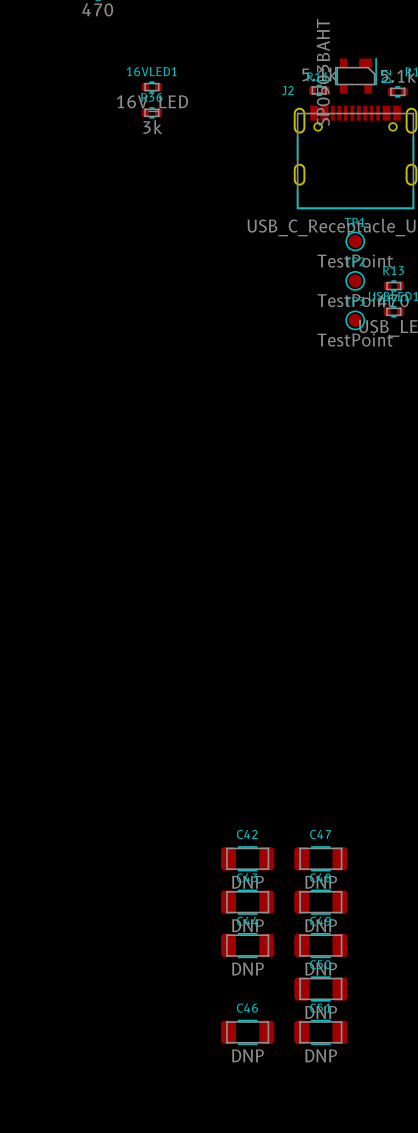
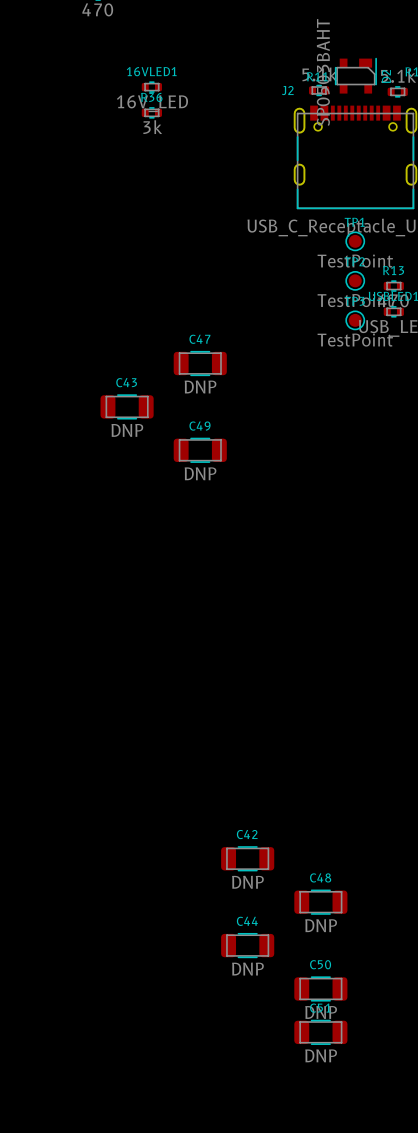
C47 position: (320, 858) -> (200, 363)
C43 position: (247, 902) -> (127, 406)
C49 position: (320, 945) -> (200, 450)
C46: DNP (247, 1032) -> none

